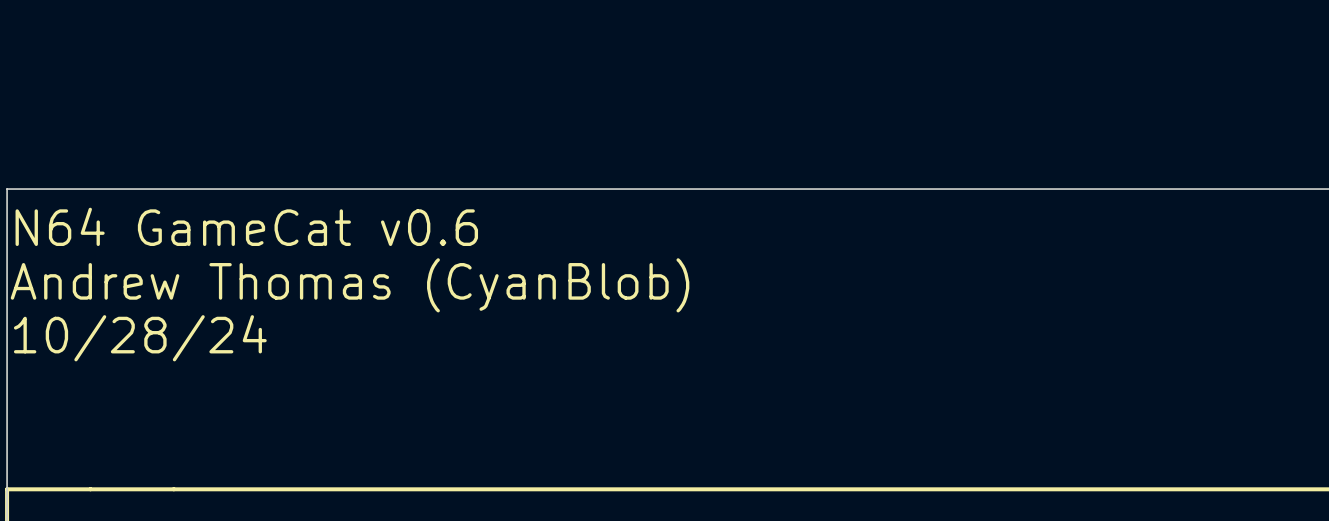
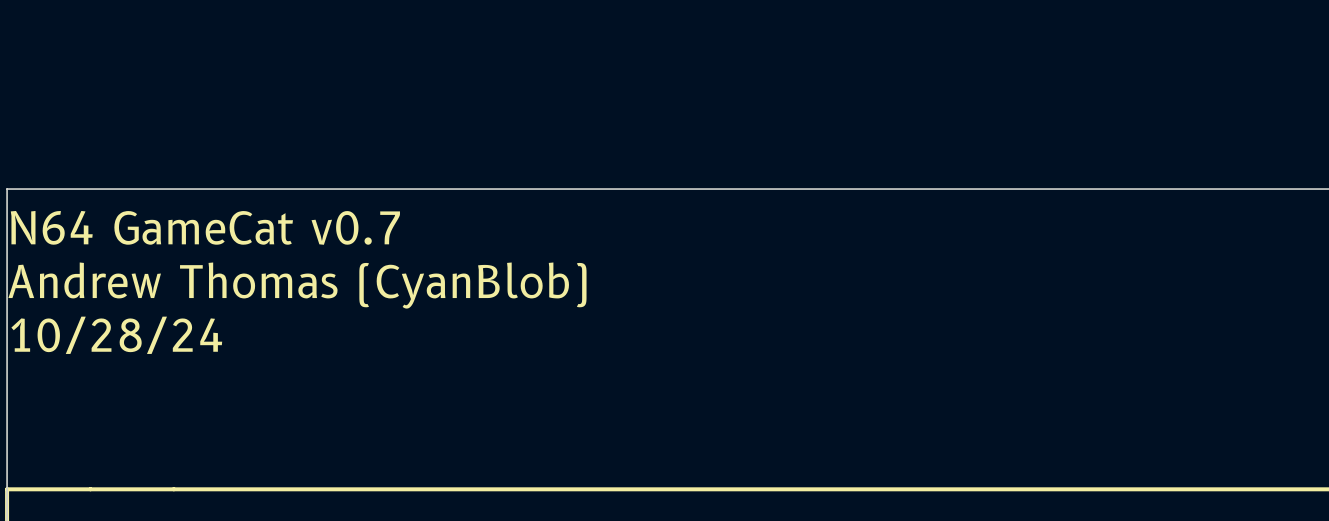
text: N64 GameCat v0.6 (246, 226) -> N64 GameCat v0.7 (205, 227)

